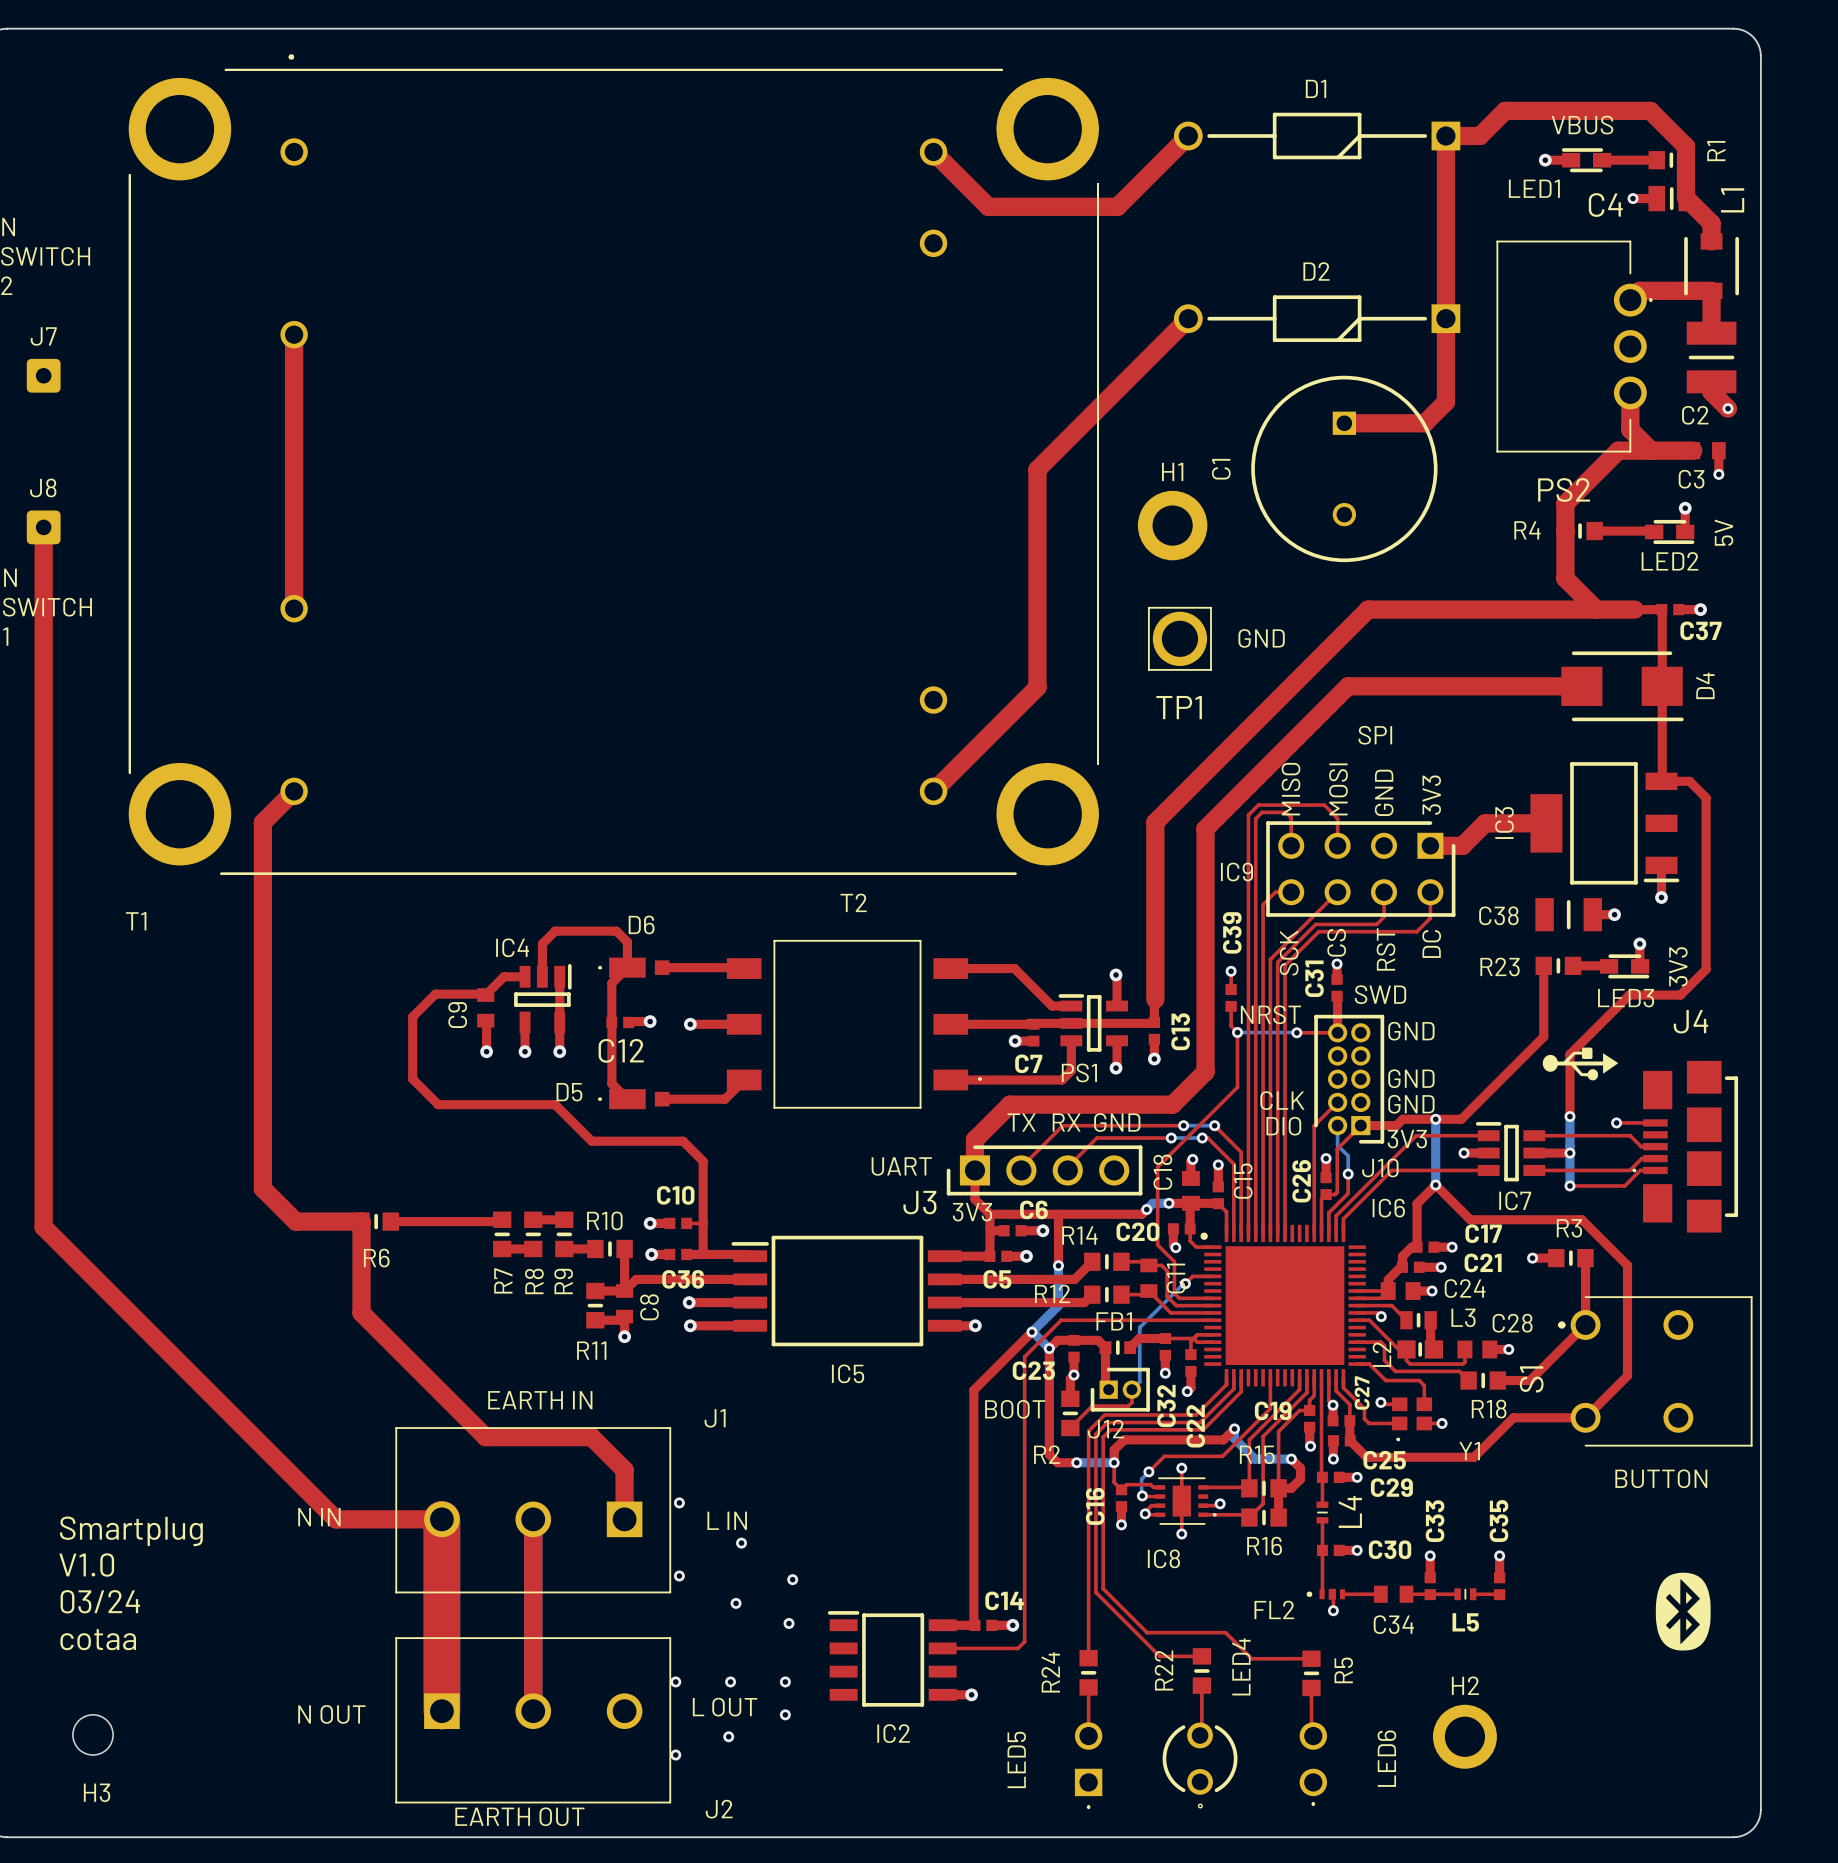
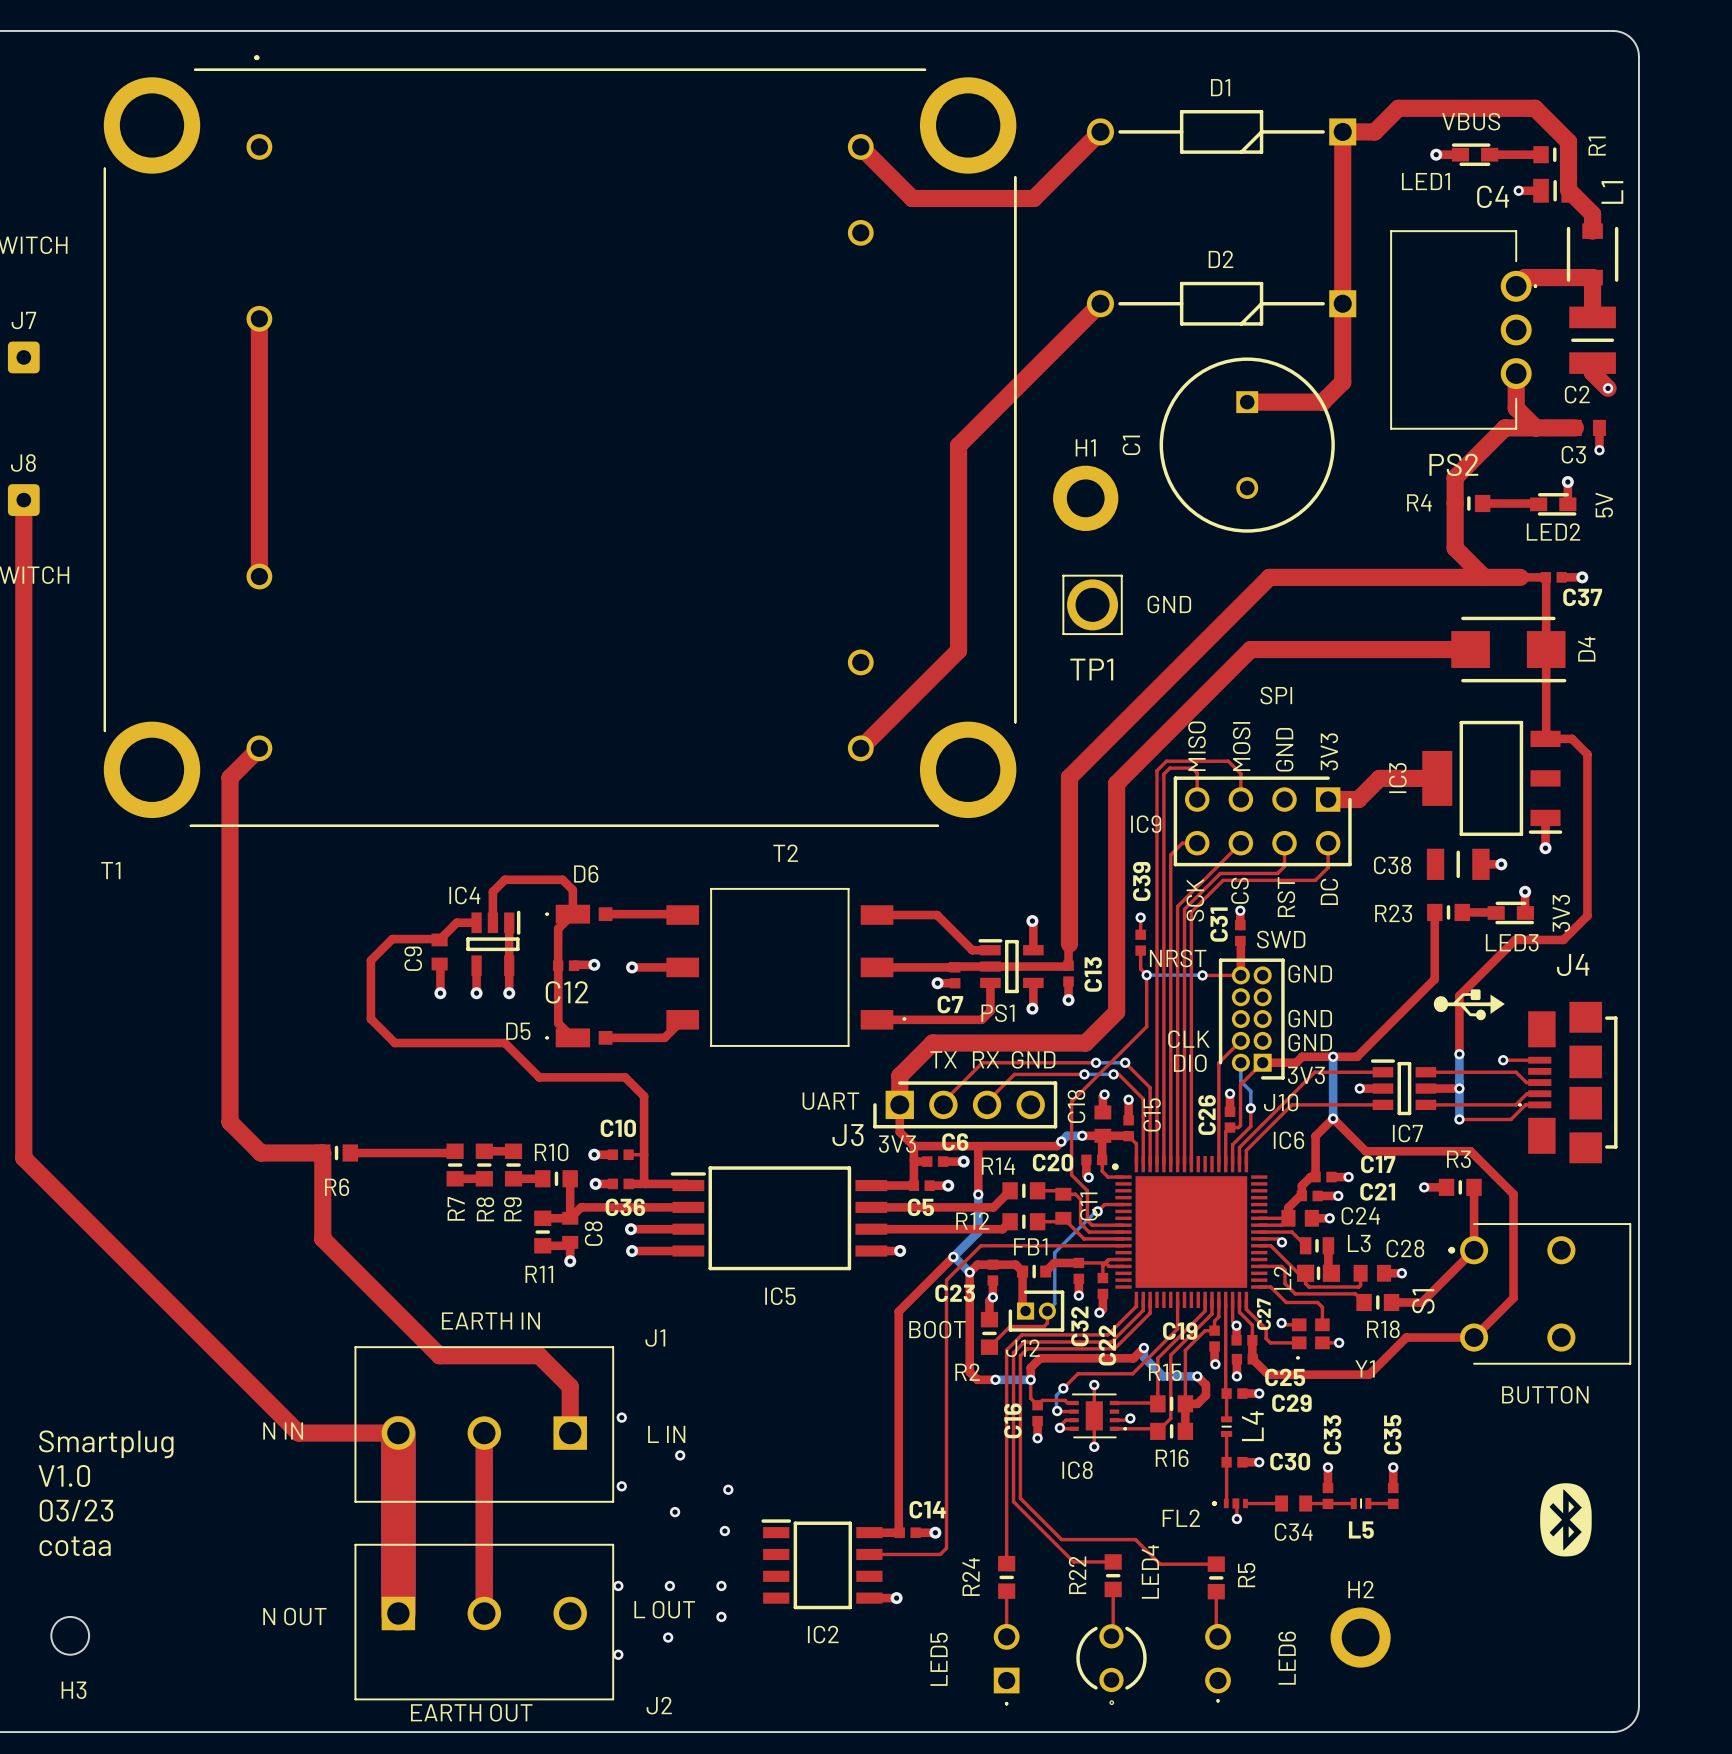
text: 03/24 (100, 1601) -> 03/23 (76, 1510)

